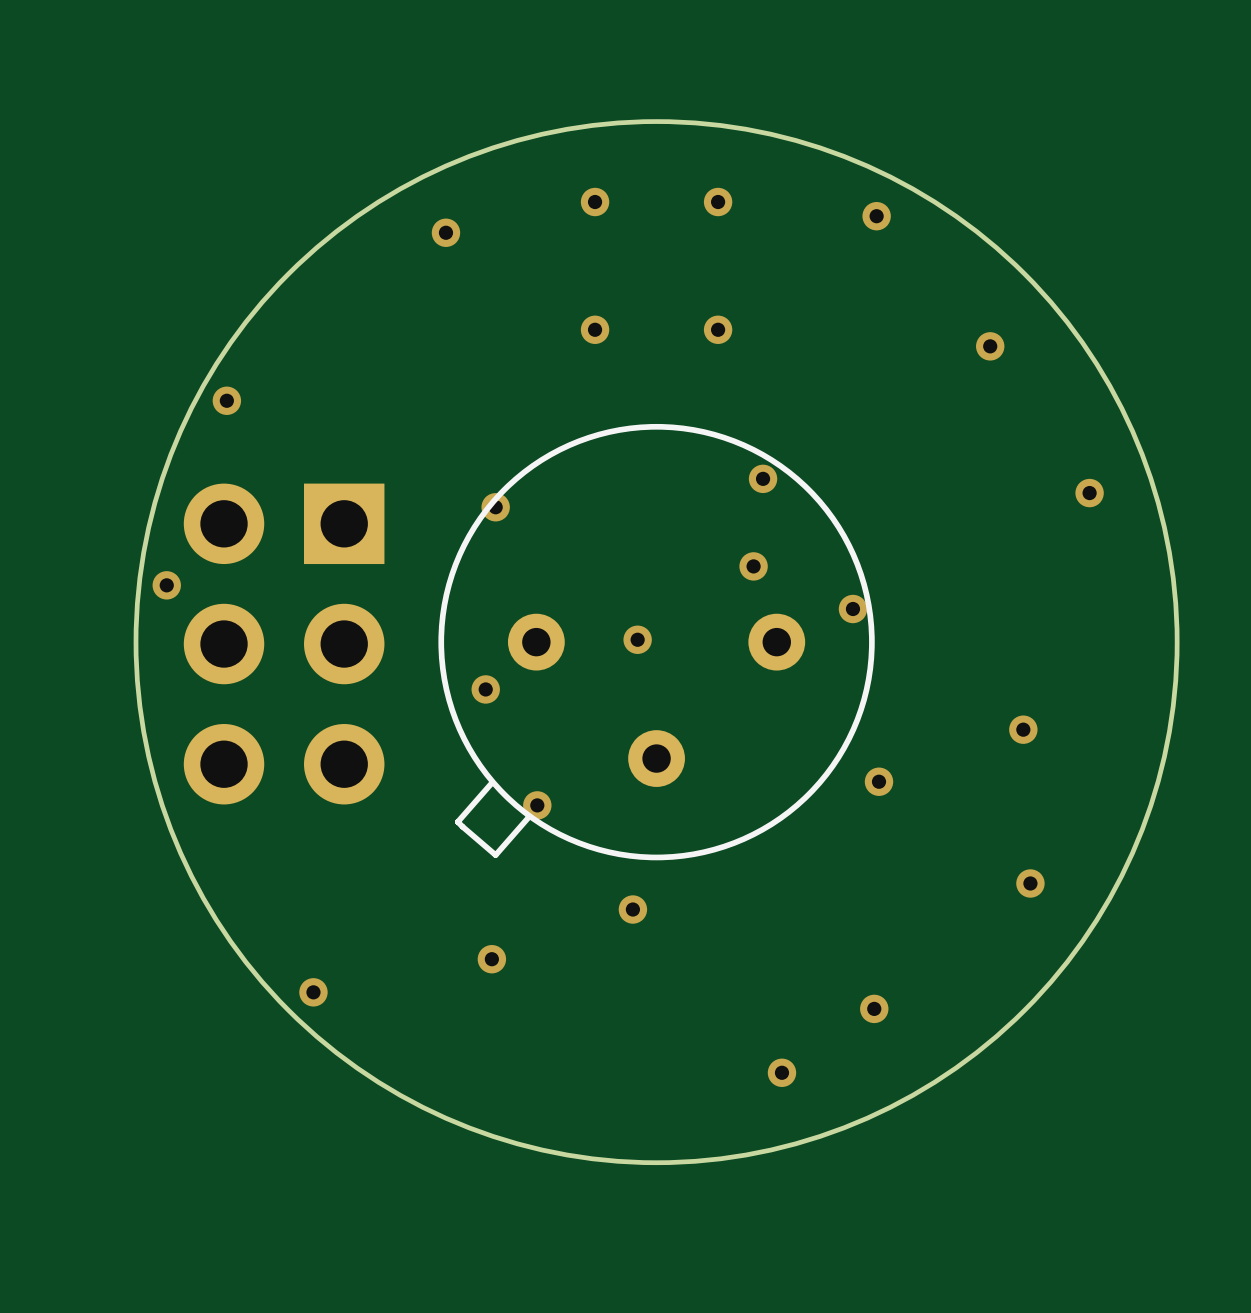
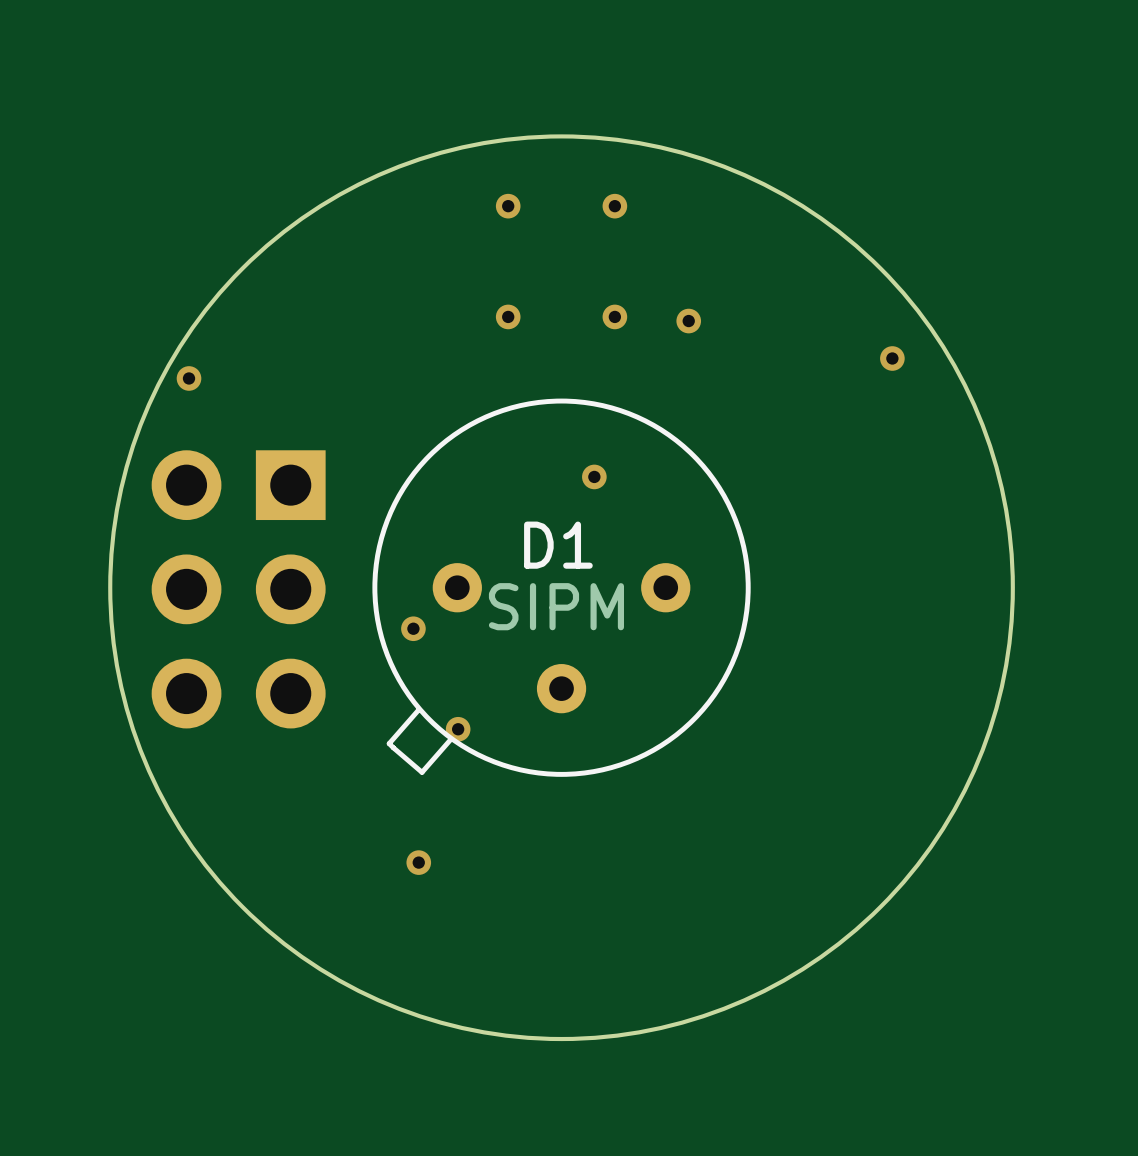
via: (876, 216) -> none
via: (445, 232) -> none
via: none -> (688, 321)
via position: (990, 346) -> (892, 358)
via: (763, 478) -> none
via: (1089, 493) -> none
via: (495, 507) -> none
via: none -> (594, 476)
via: (753, 566) -> none
via: (166, 585) -> none
D1 name: none -> D1 (558, 545)
via: (852, 609) -> none
via: (637, 639) -> none
D1 value: none -> SIPM (556, 606)
via: (1023, 729) -> none
via: (879, 781) -> none
via: (1030, 883) -> none
via: (632, 909) -> none
via: (313, 992) -> none
via: (874, 1008) -> none
via: (781, 1072) -> none

